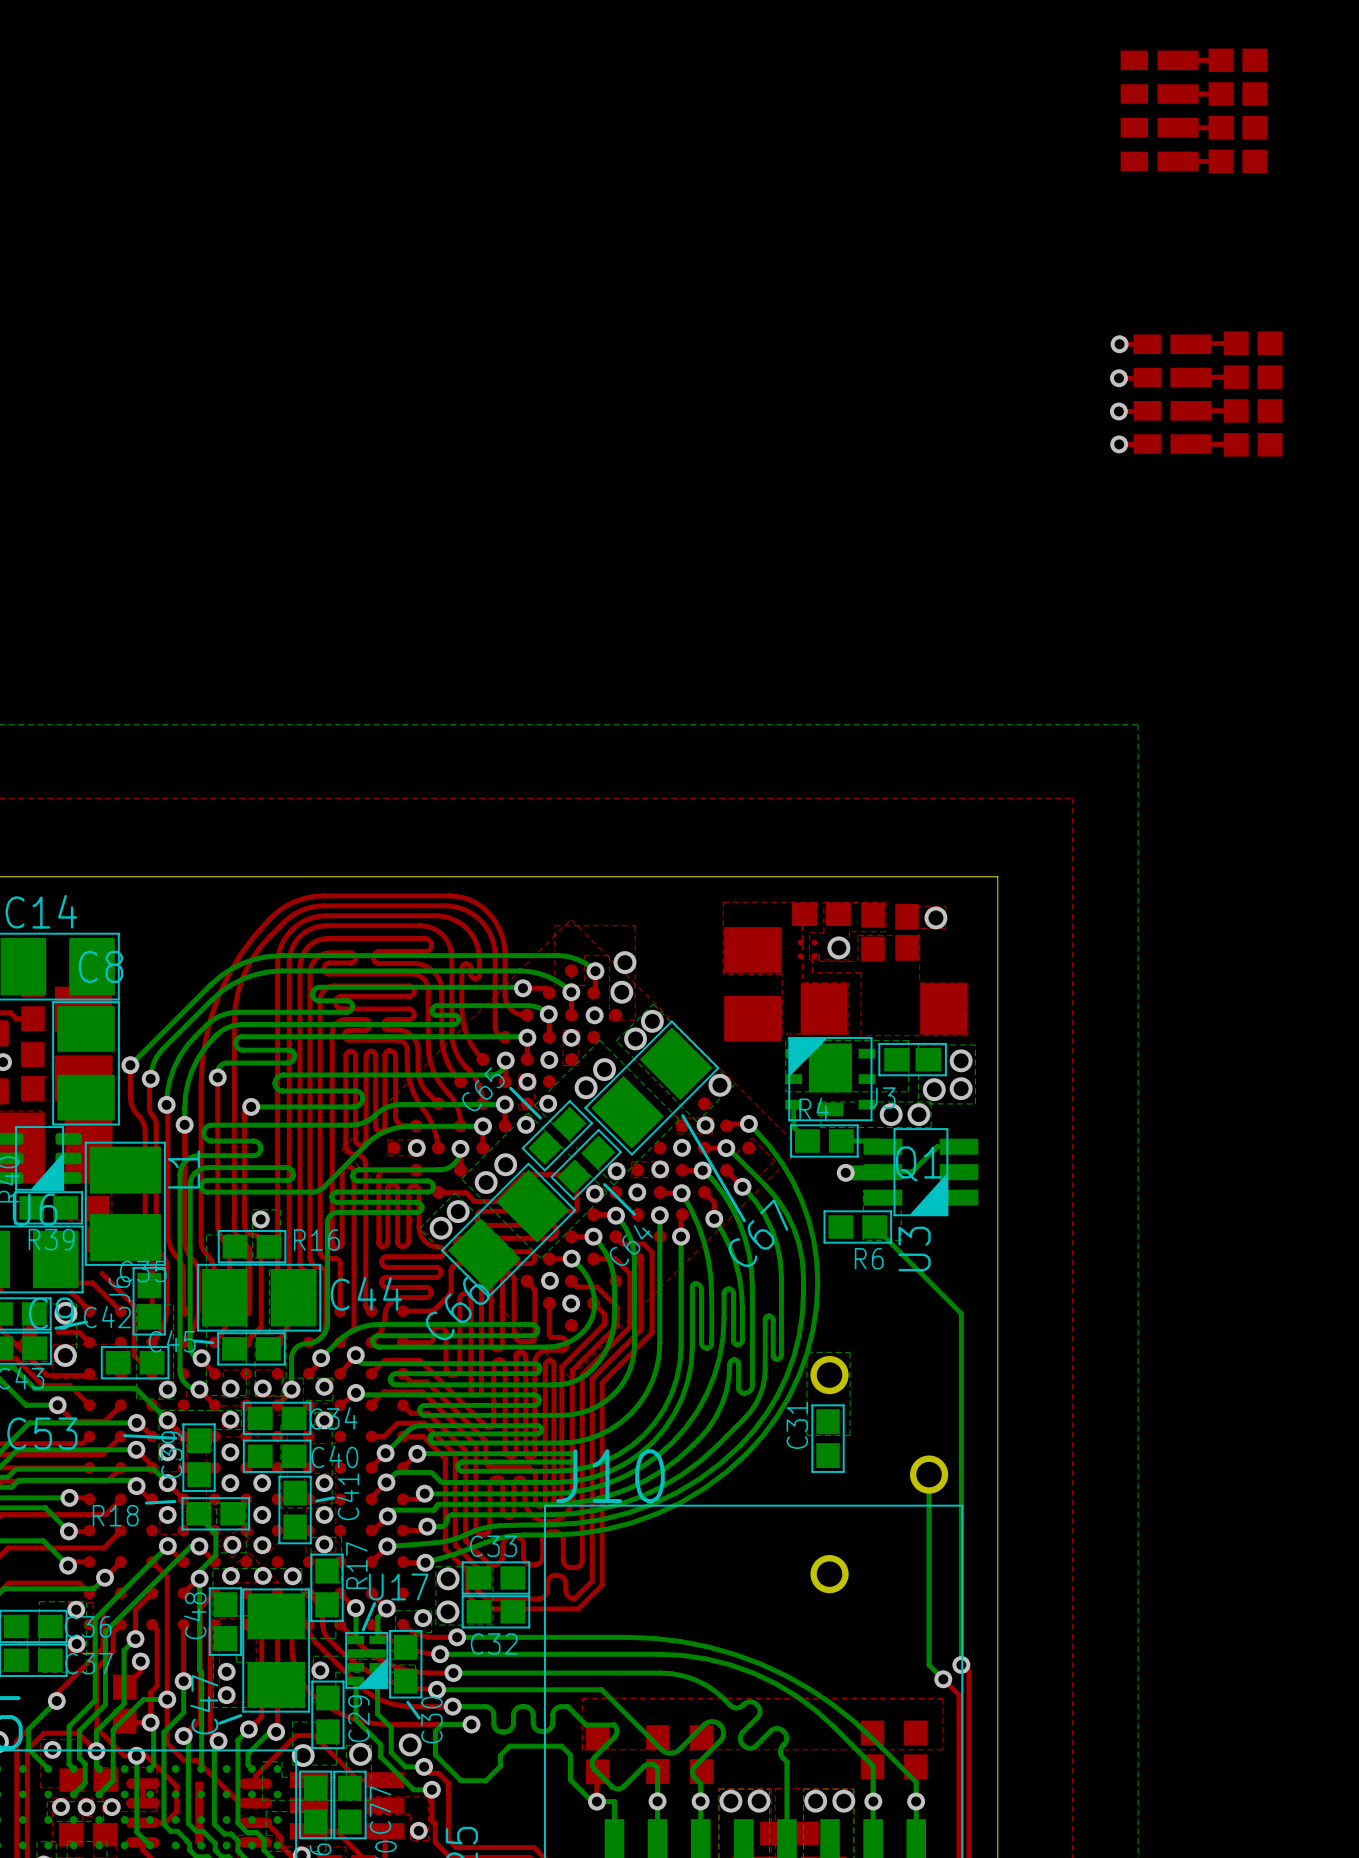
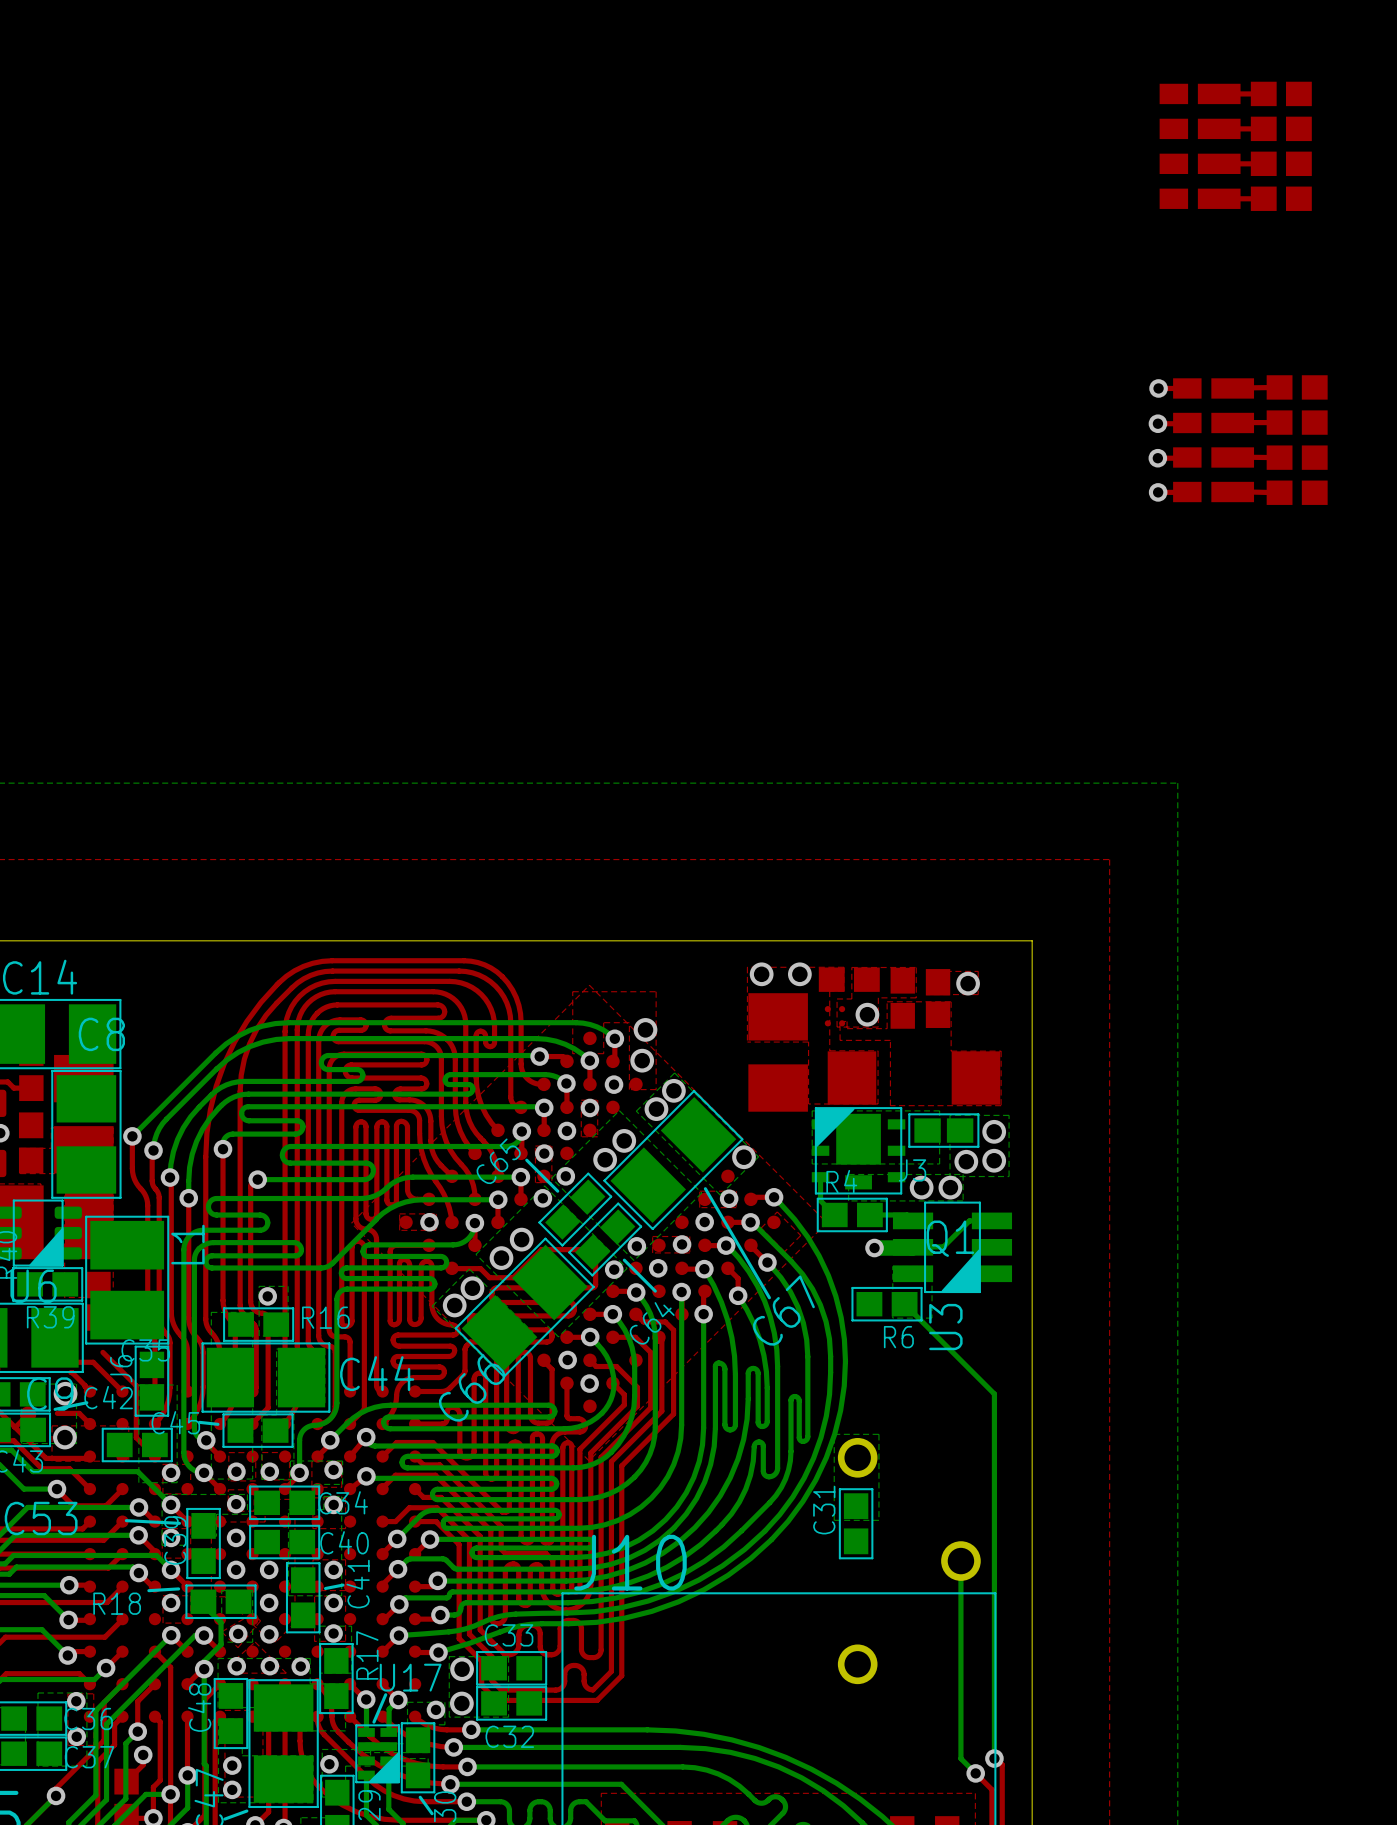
via: none -> (761, 974)
via: none -> (799, 974)

